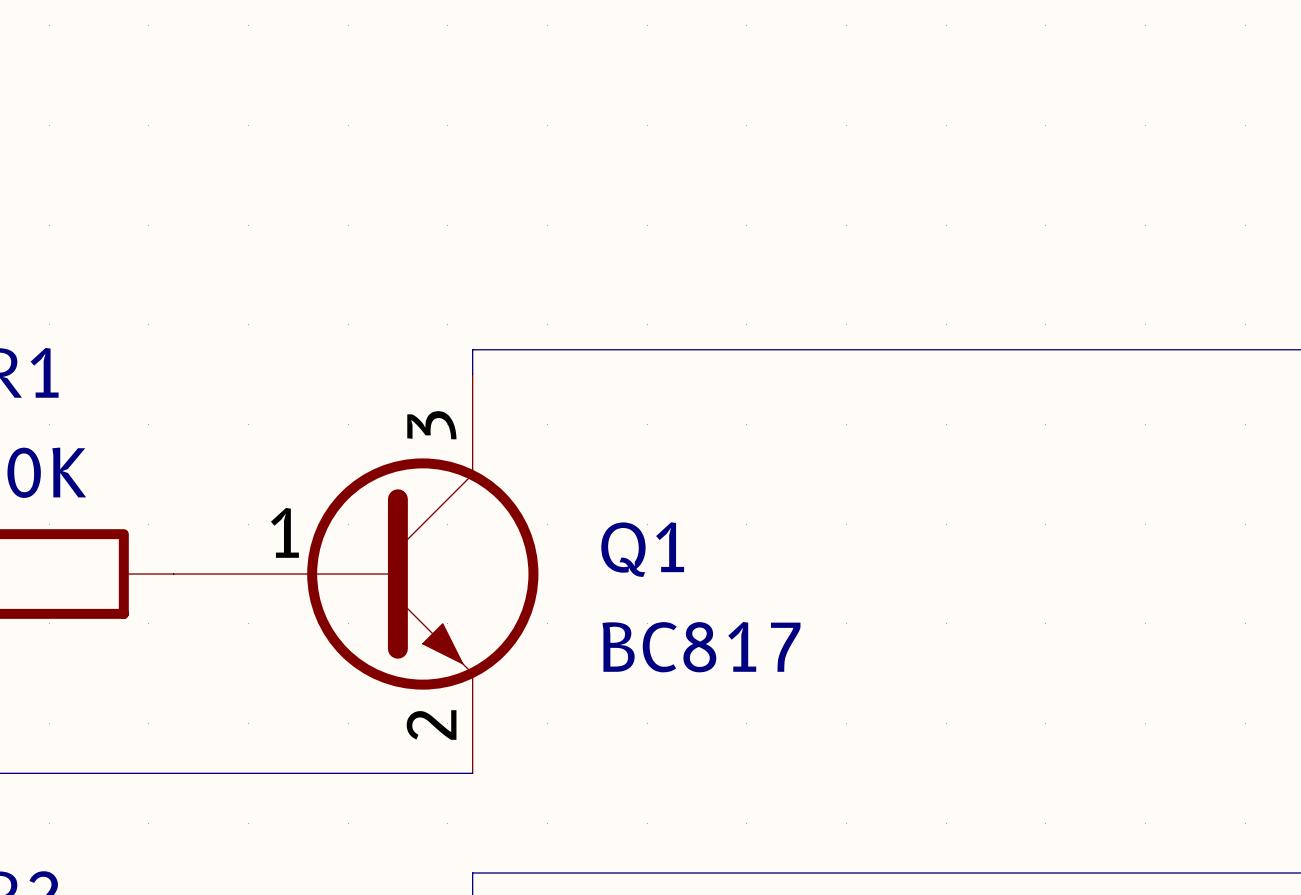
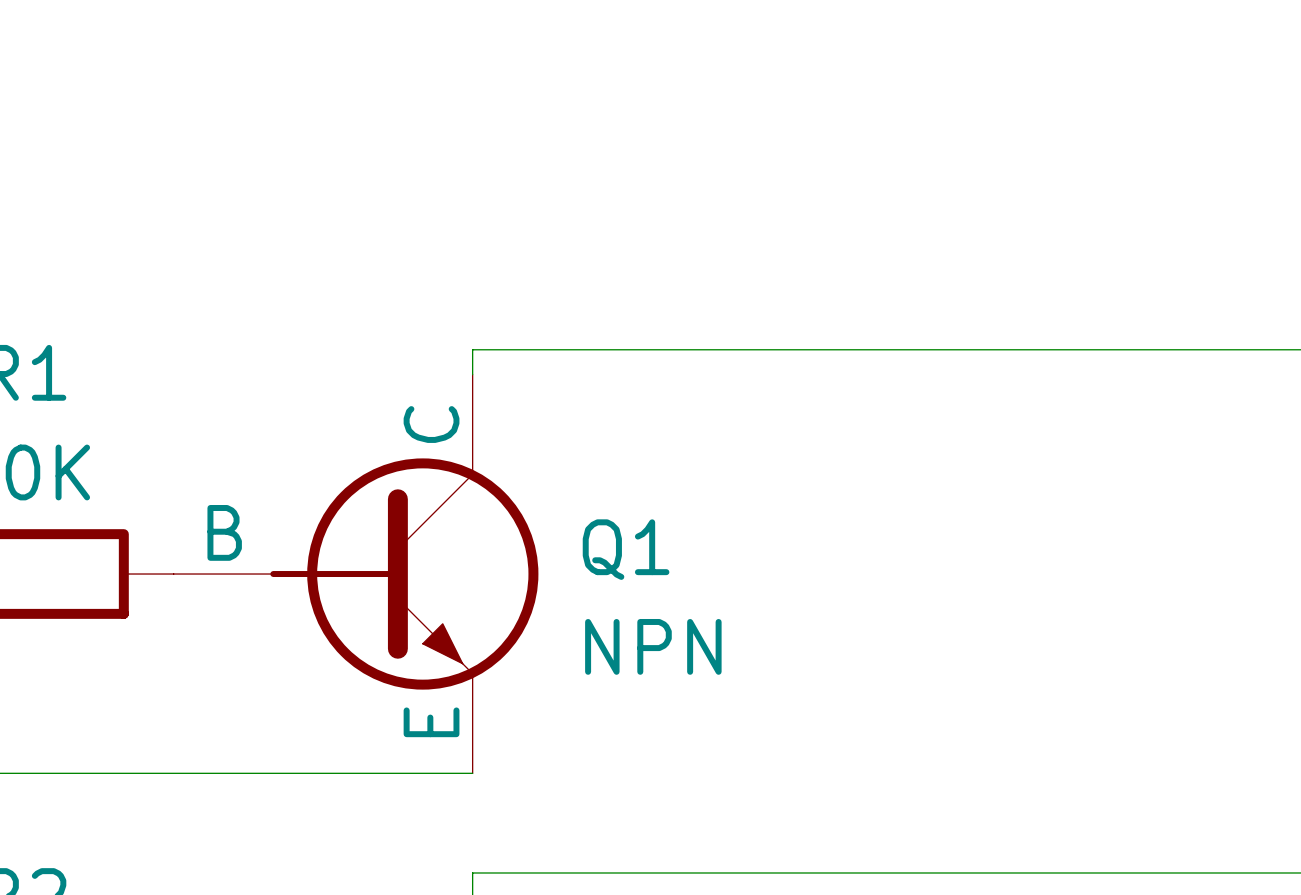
Q1 symbol: [173, 374, 539, 774] -> [173, 374, 539, 774]
Q1 value: BC817 (701, 647) -> NPN (653, 646)

